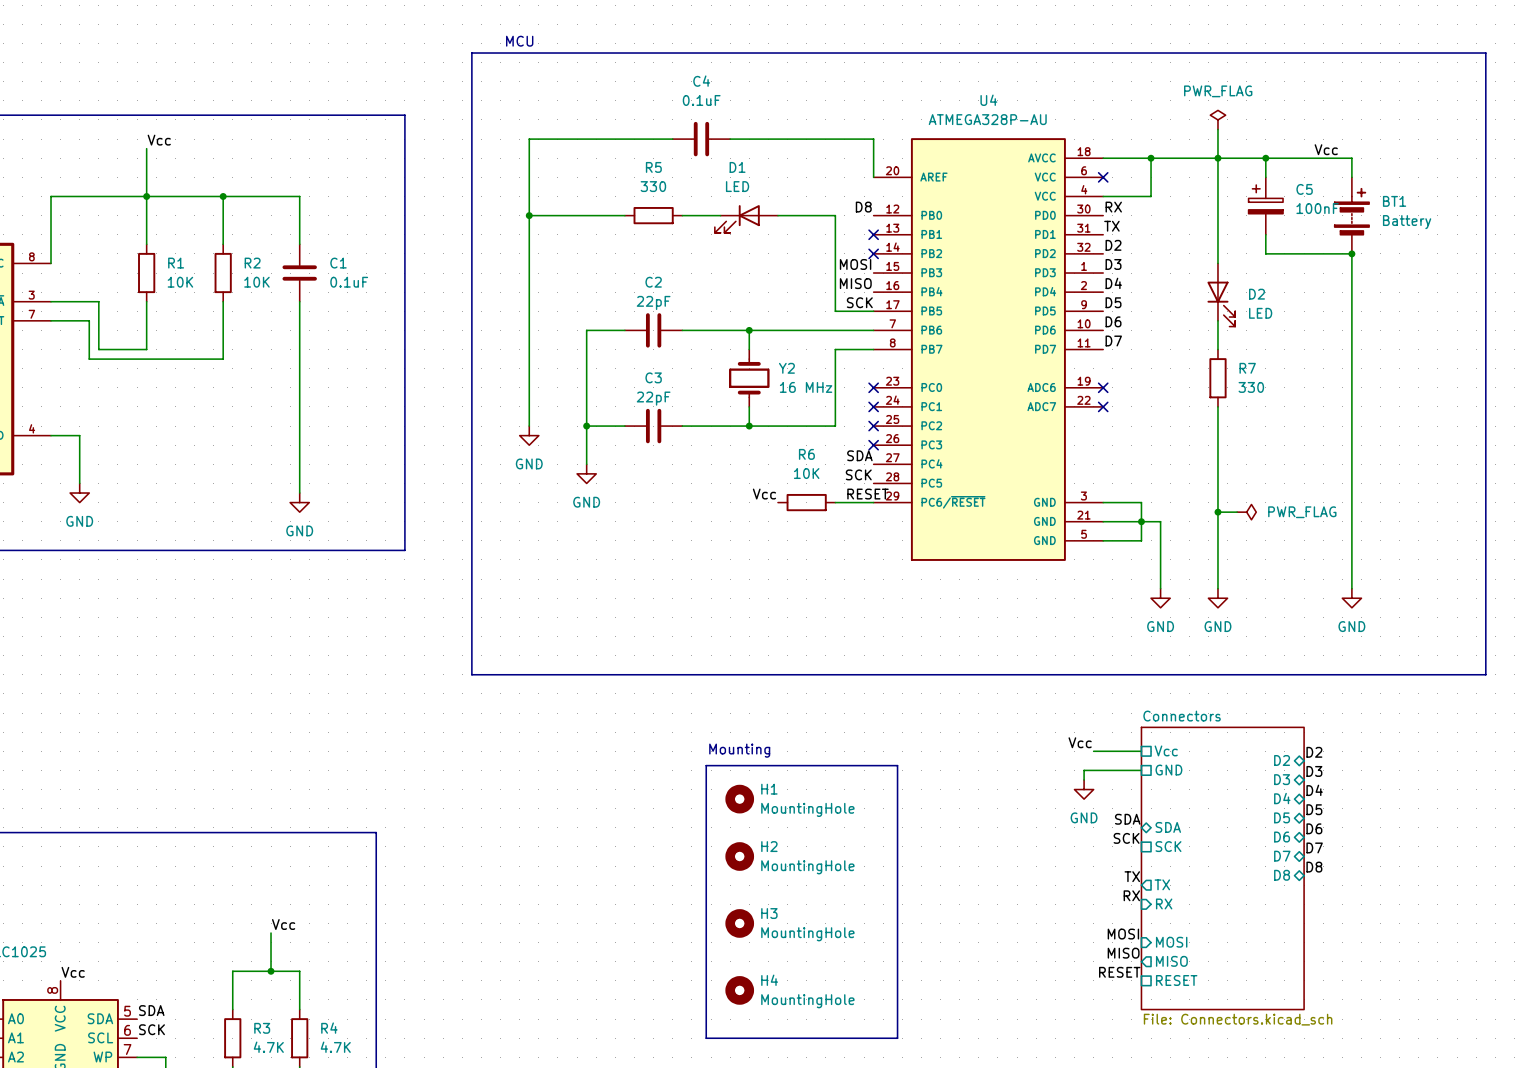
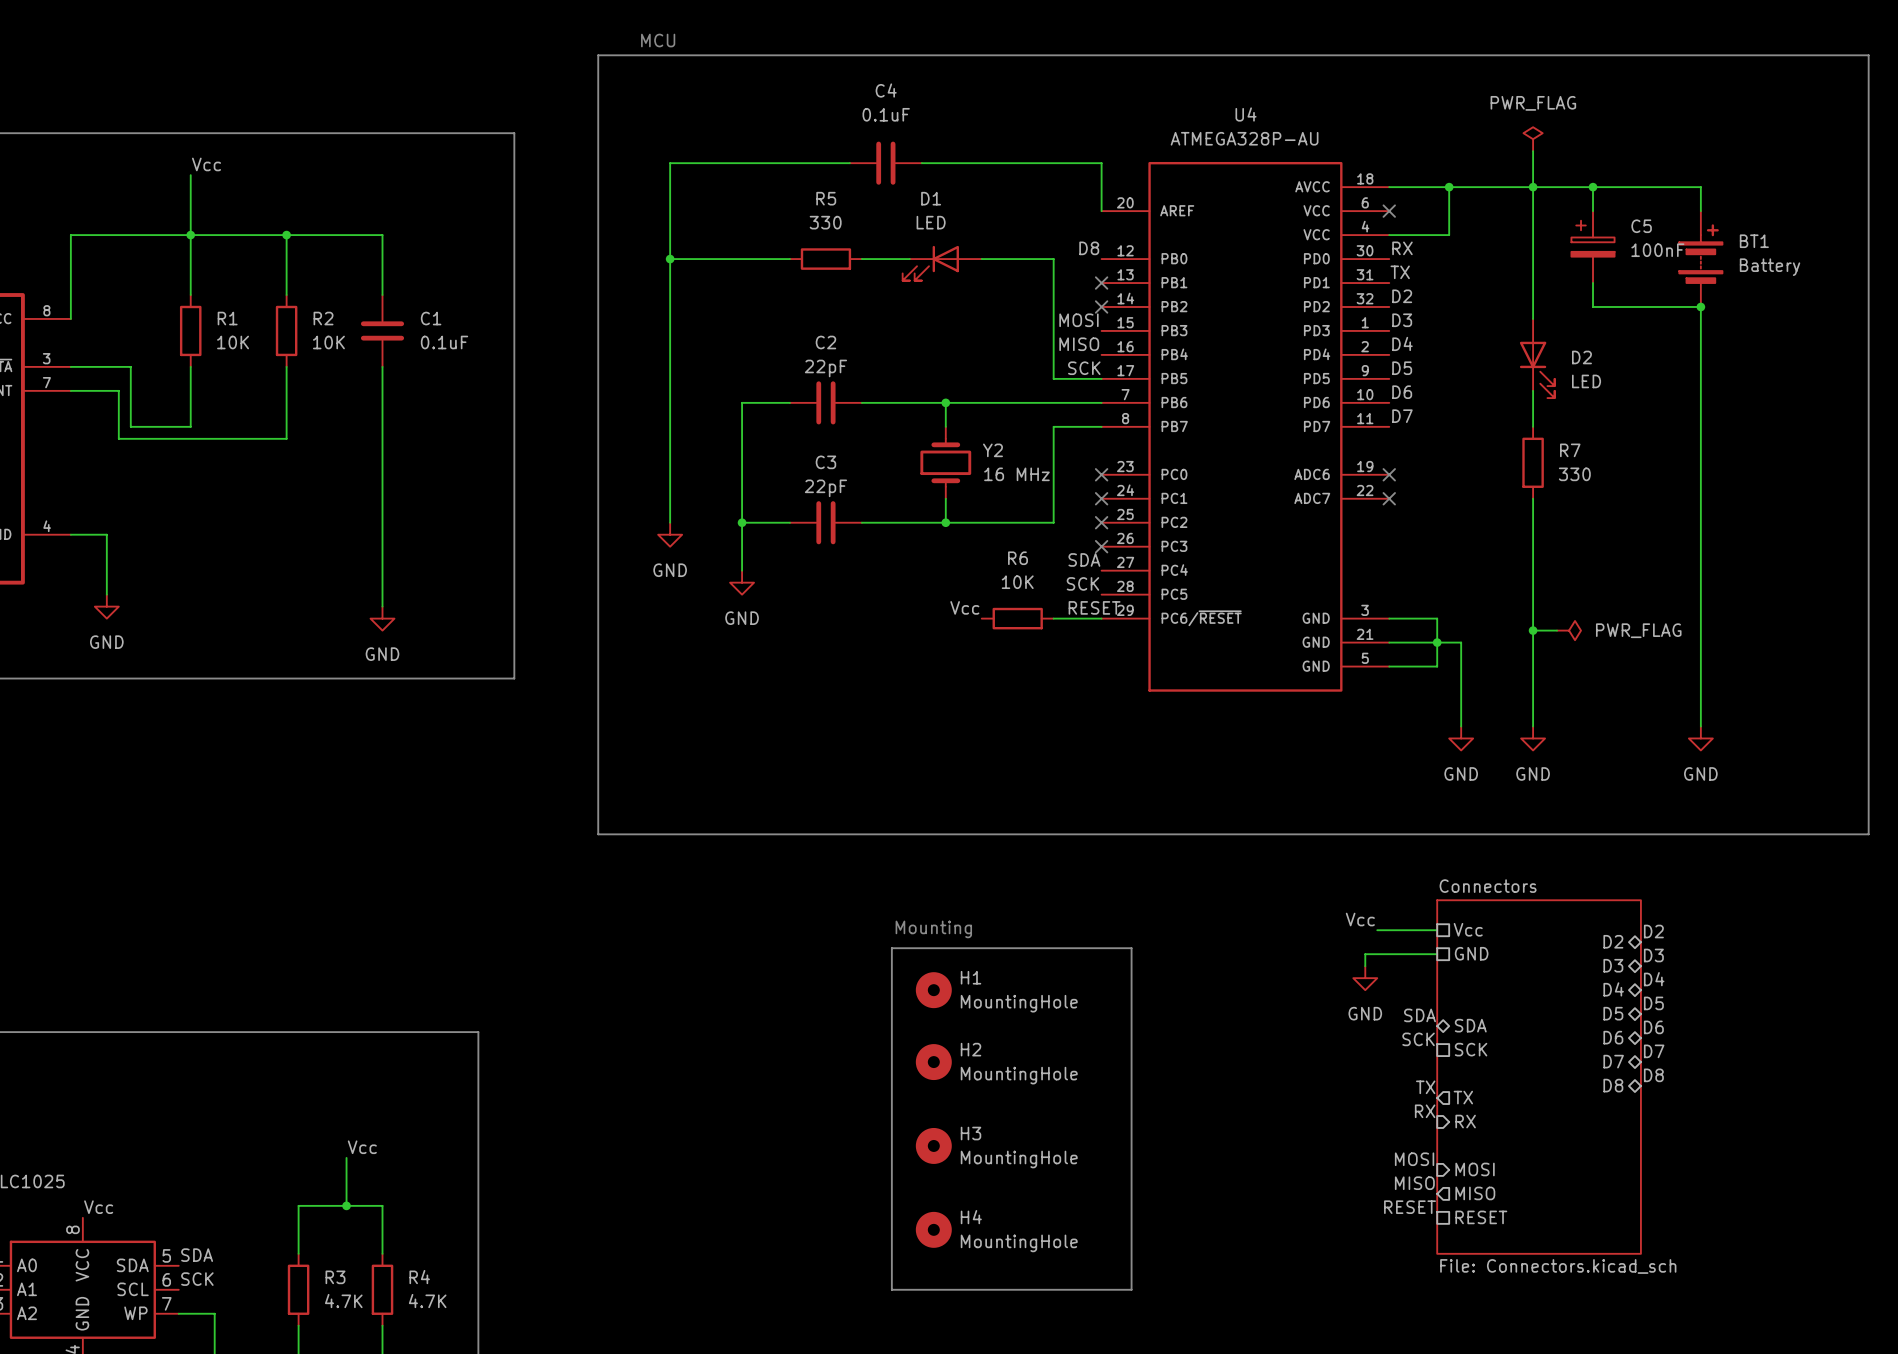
label: Vcc (1326, 149) -> none

